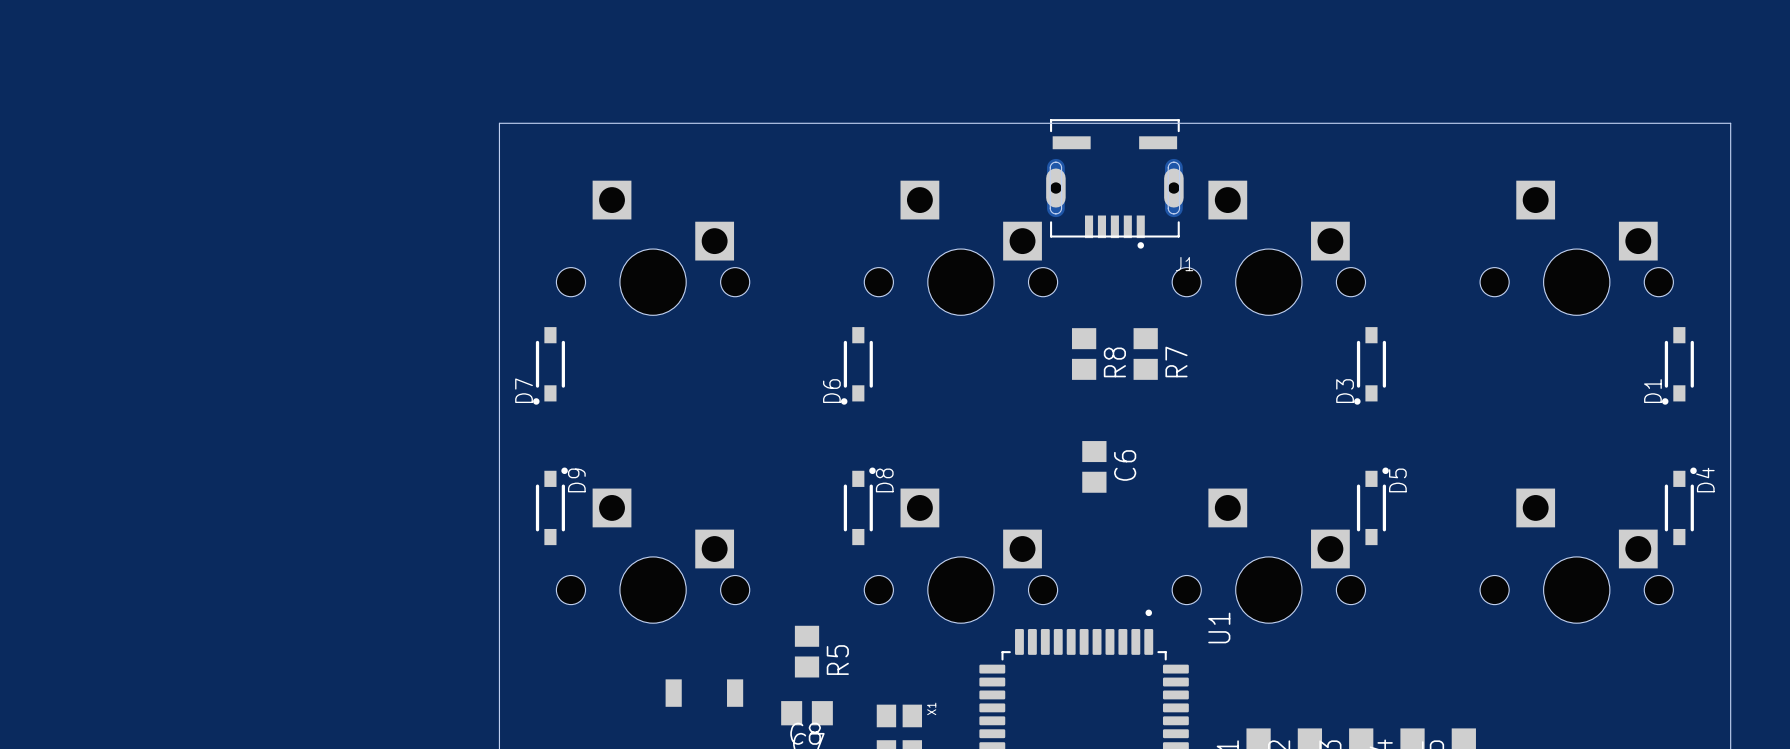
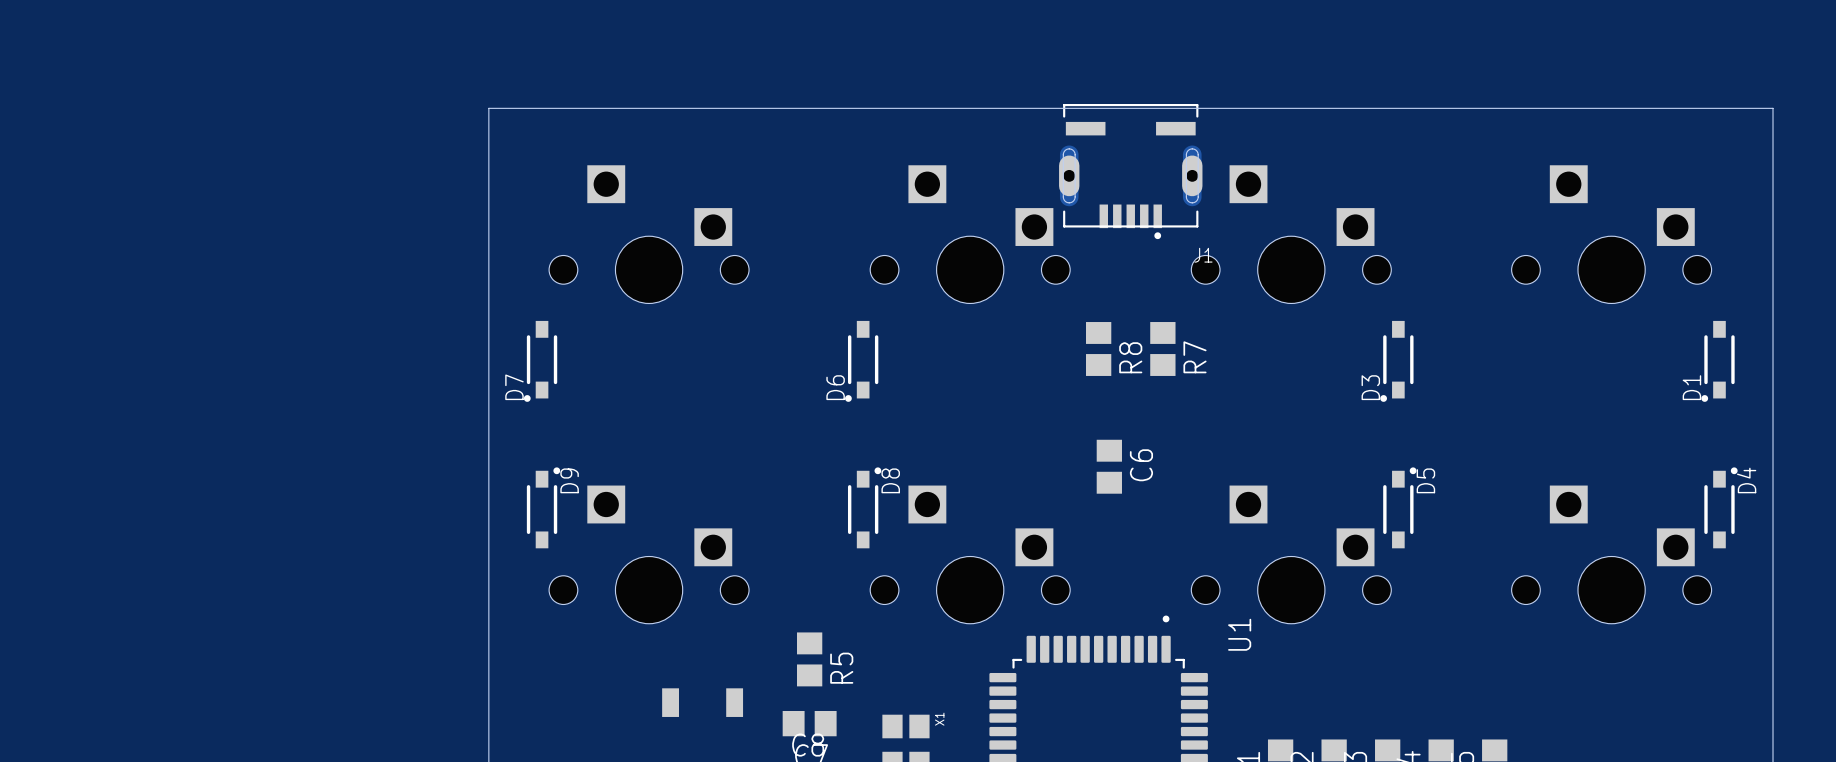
part footprint: [556, 180, 750, 316] -> [549, 165, 750, 304]
part footprint: [864, 180, 1058, 316] -> [870, 165, 1071, 304]
part footprint: [1172, 180, 1366, 316] -> [1191, 165, 1392, 304]
part footprint: [1480, 180, 1674, 316] -> [1511, 165, 1712, 304]
part footprint: [556, 488, 750, 624] -> [549, 485, 750, 624]
part footprint: [864, 488, 1058, 624] -> [870, 485, 1071, 624]
part footprint: [1172, 488, 1366, 624] -> [1191, 485, 1392, 624]
part footprint: [1480, 488, 1674, 624] -> [1511, 485, 1712, 624]

